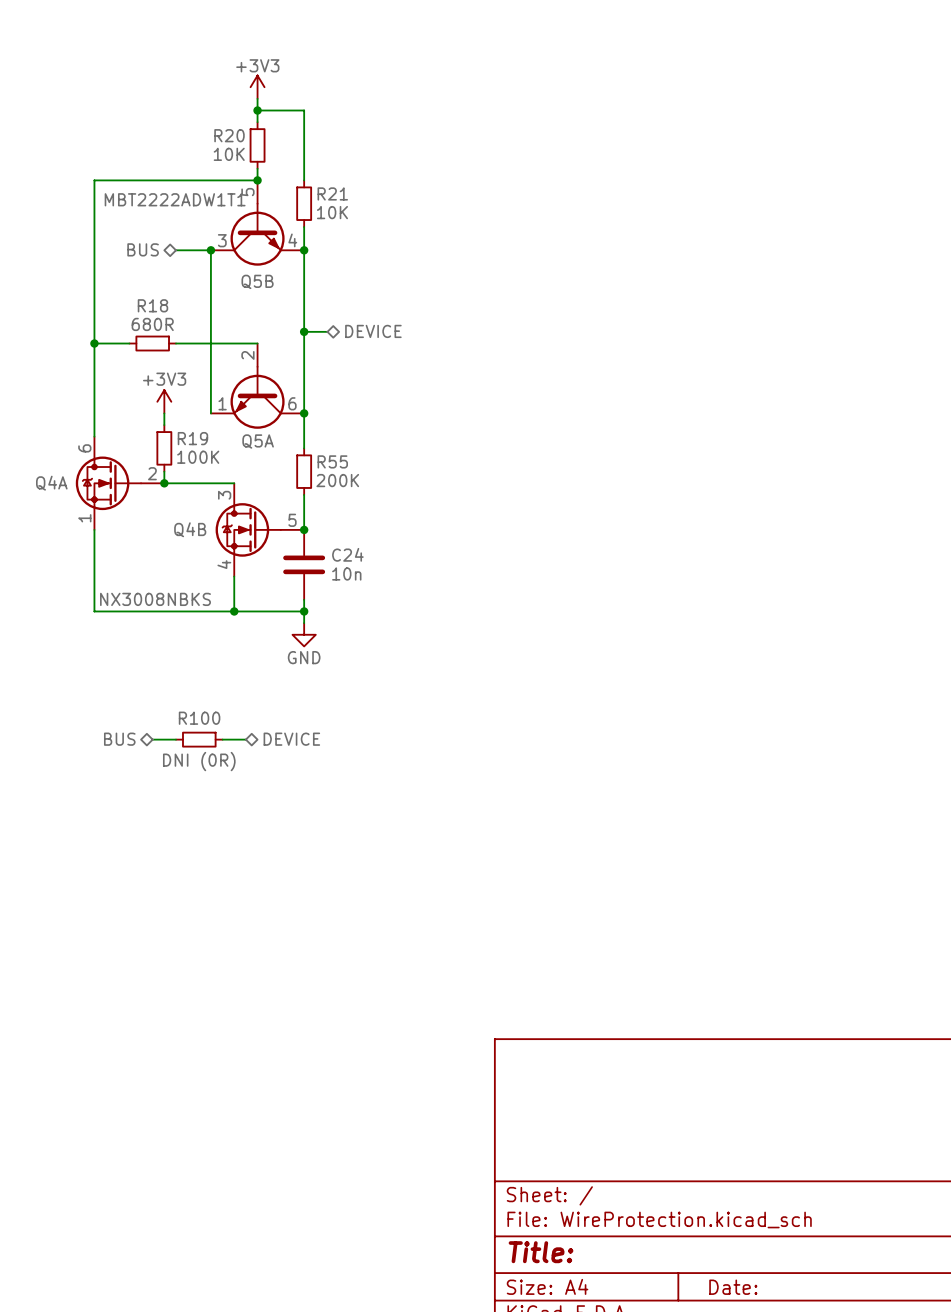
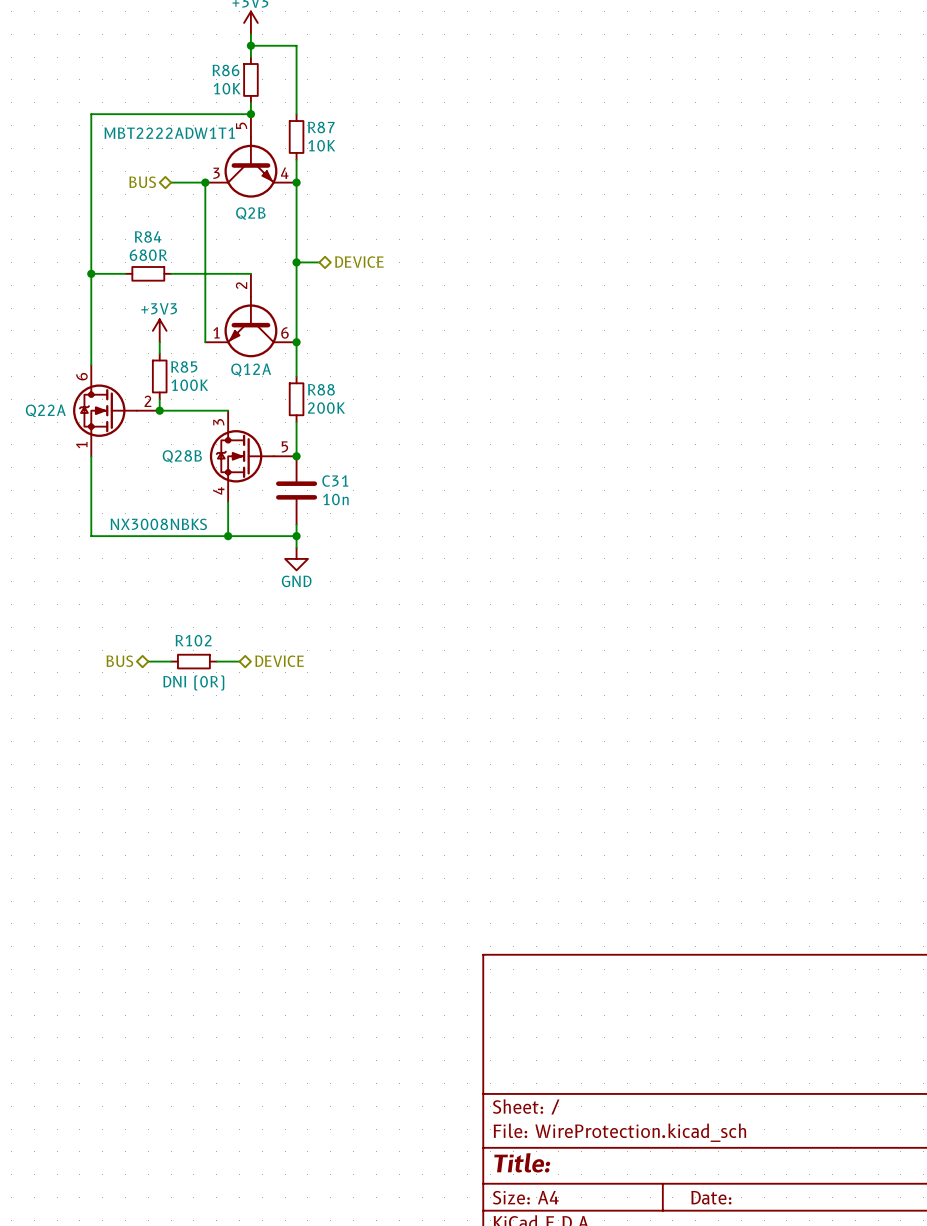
R20 name: R20 (229, 135) -> R86 (225, 70)
R21 name: R21 (332, 193) -> R87 (321, 127)
Q5B name: Q5B (257, 281) -> Q2B (250, 213)
R18 name: R18 (152, 305) -> R84 (148, 236)
R19 name: R19 (192, 438) -> R85 (184, 367)
Q5A name: Q5A (258, 441) -> Q12A (251, 369)
R55 name: R55 (332, 461) -> R88 (321, 389)
Q4A name: Q4A (51, 483) -> Q22A (45, 410)
Q4B name: Q4B (190, 529) -> Q28B (182, 456)
C24 name: C24 (347, 554) -> C31 (335, 481)
R100 name: R100 (199, 718) -> R102 (193, 640)

